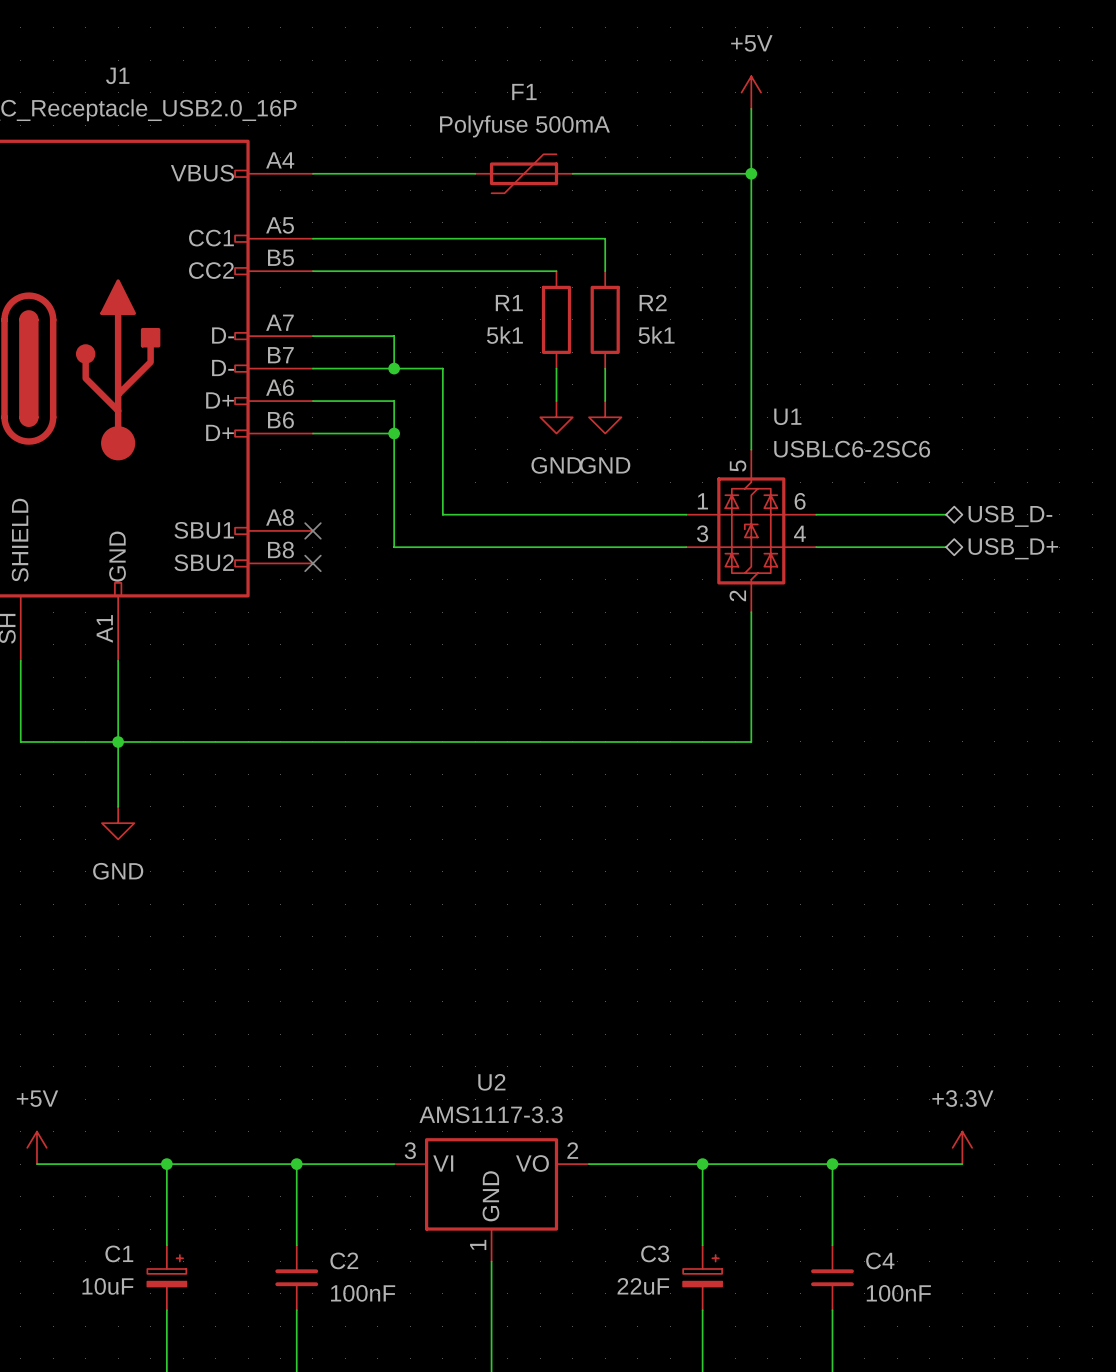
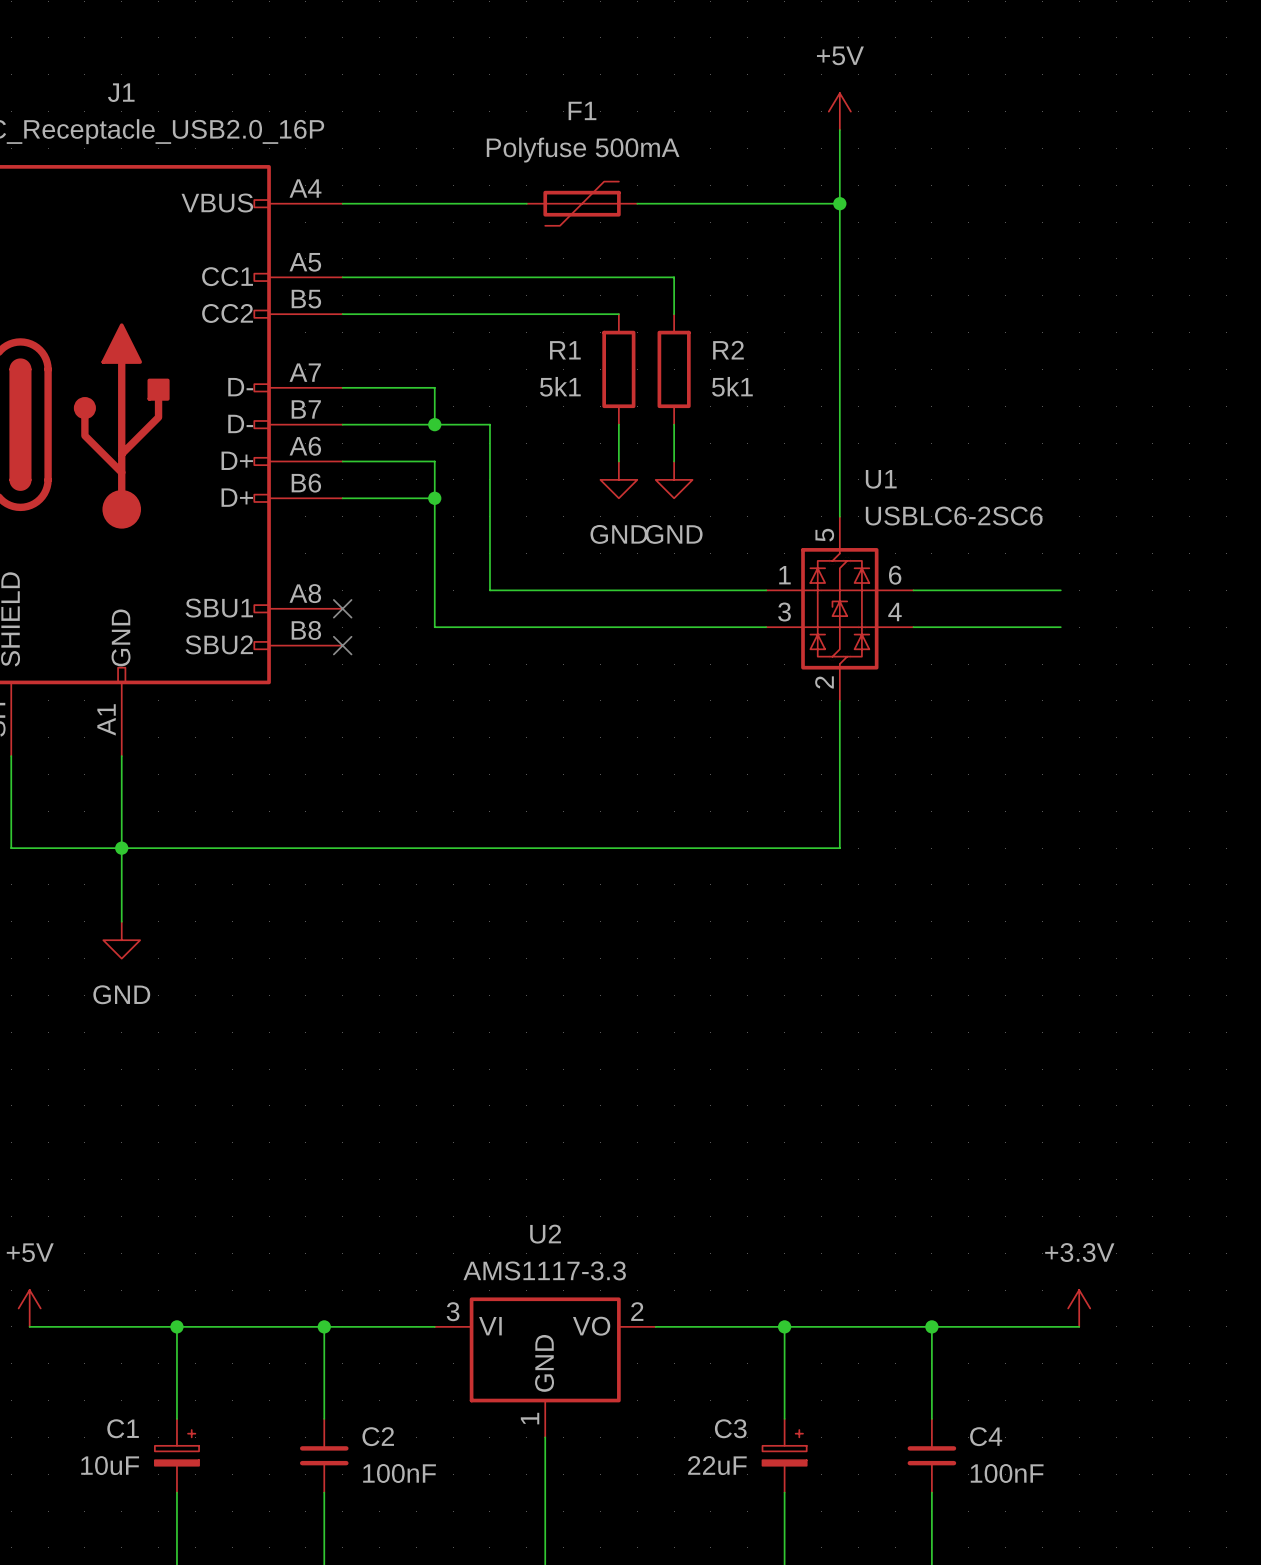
hierarchical label: USB_D- (1010, 516) -> none
hierarchical label: USB_D+ (1013, 548) -> none

